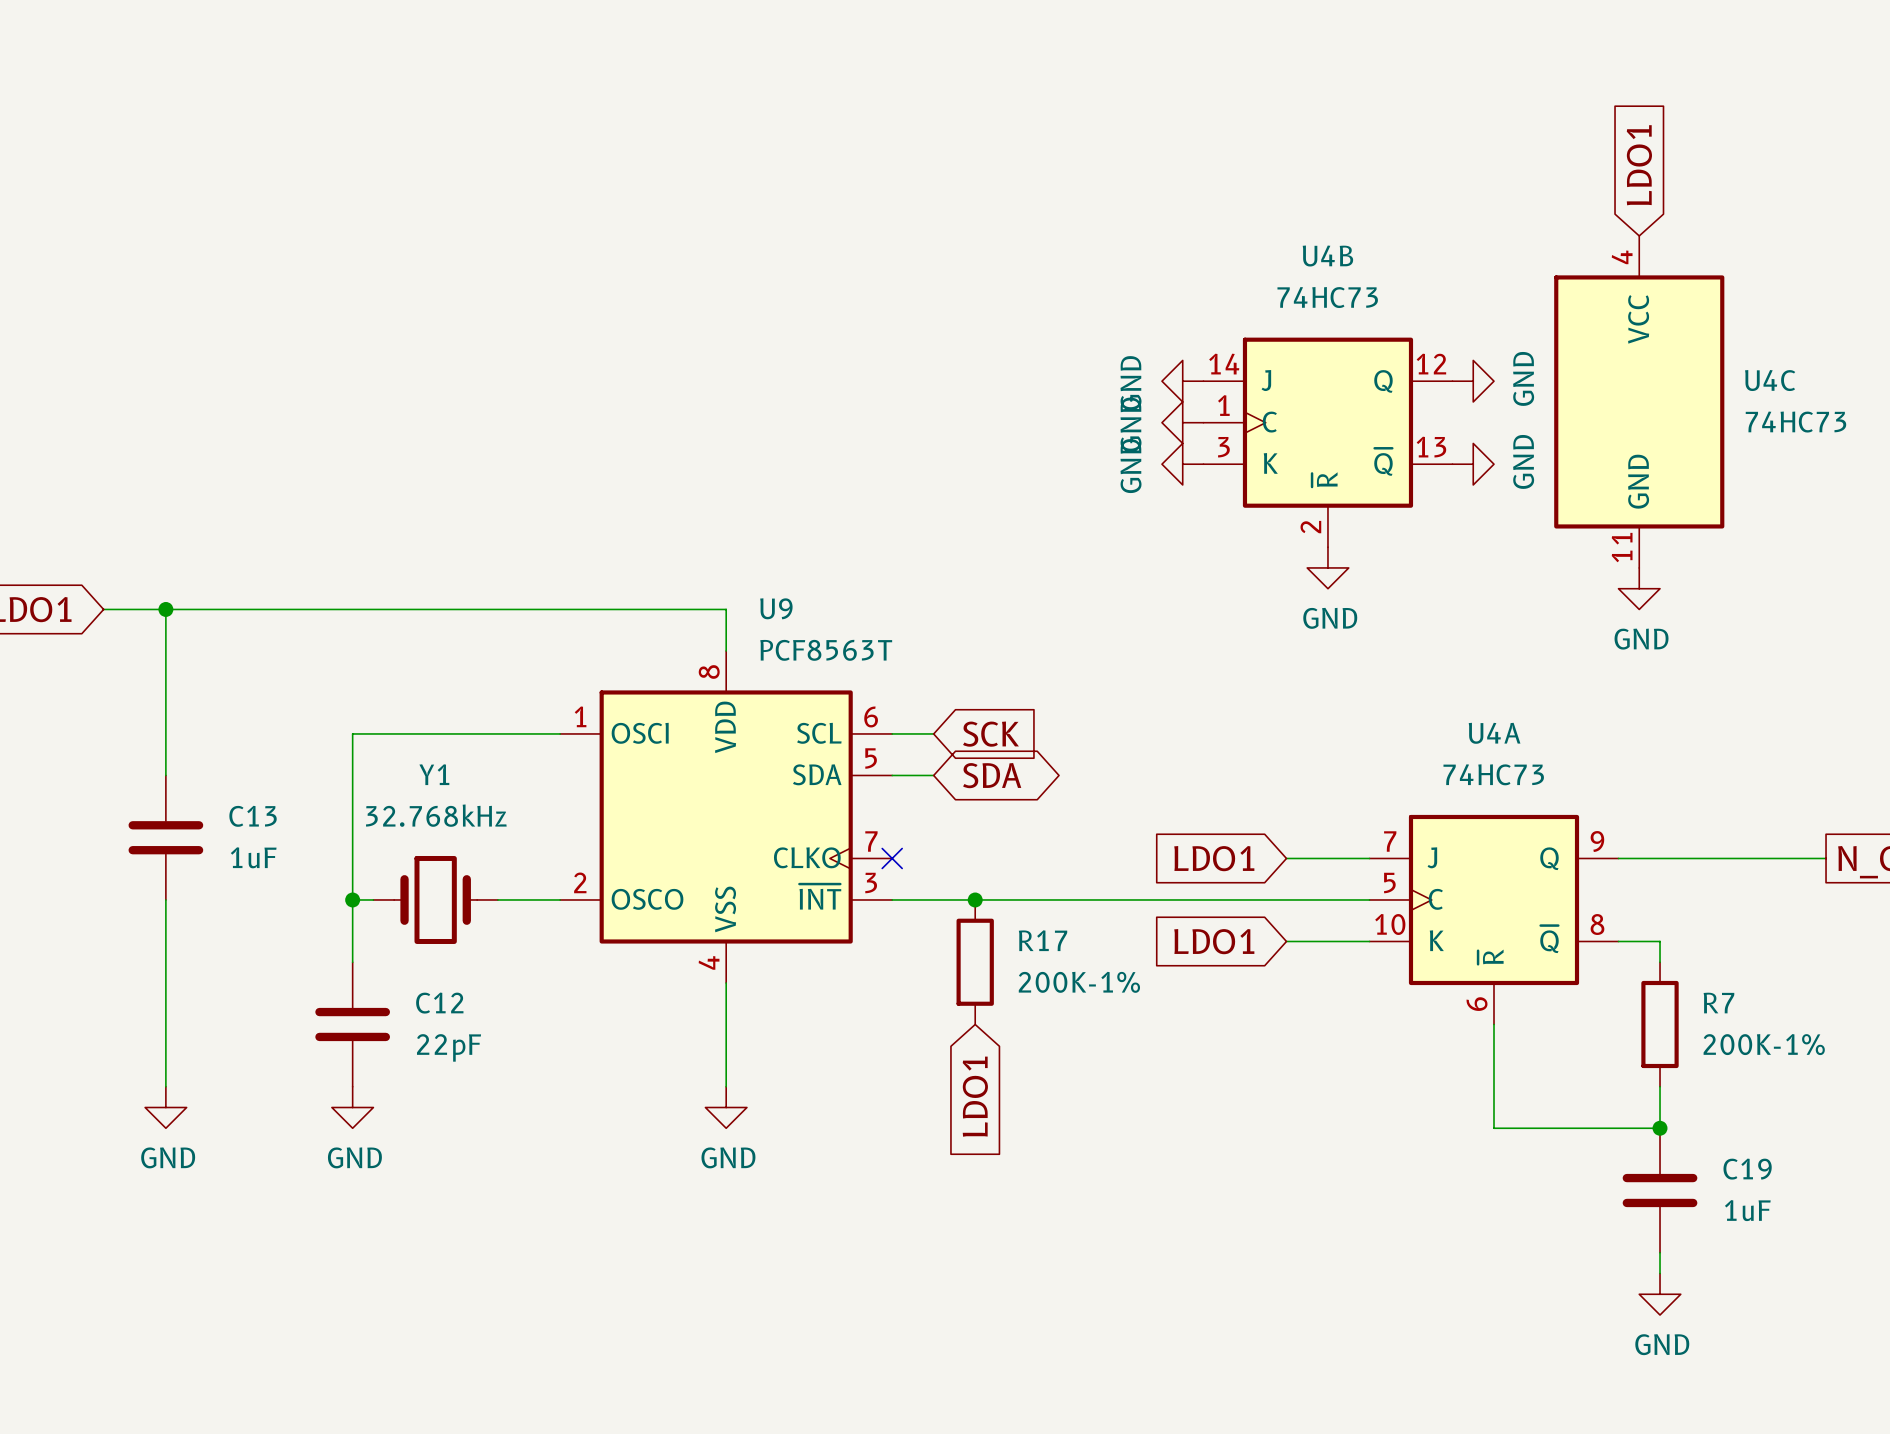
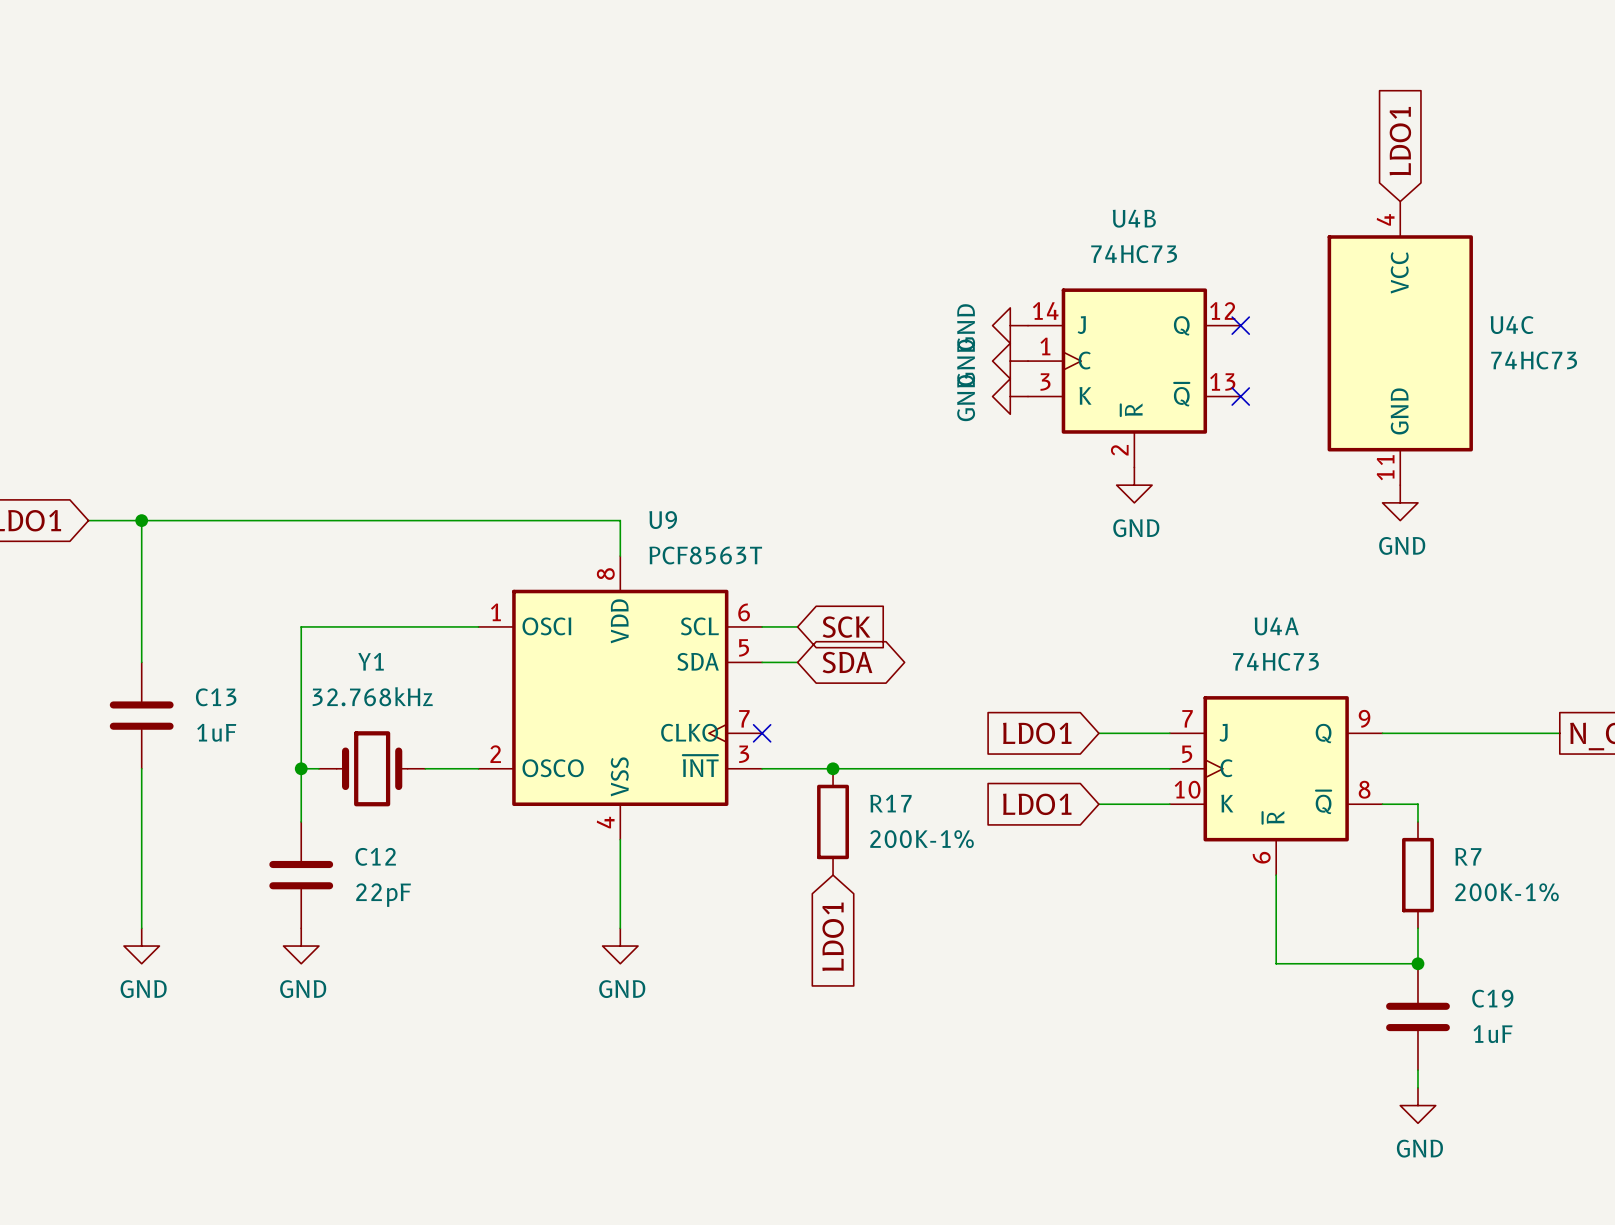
no-connect mark: none -> (1240, 325)
power symbol: GND (1473, 381) -> none
no-connect mark: none -> (1240, 396)
power symbol: GND (1473, 464) -> none

